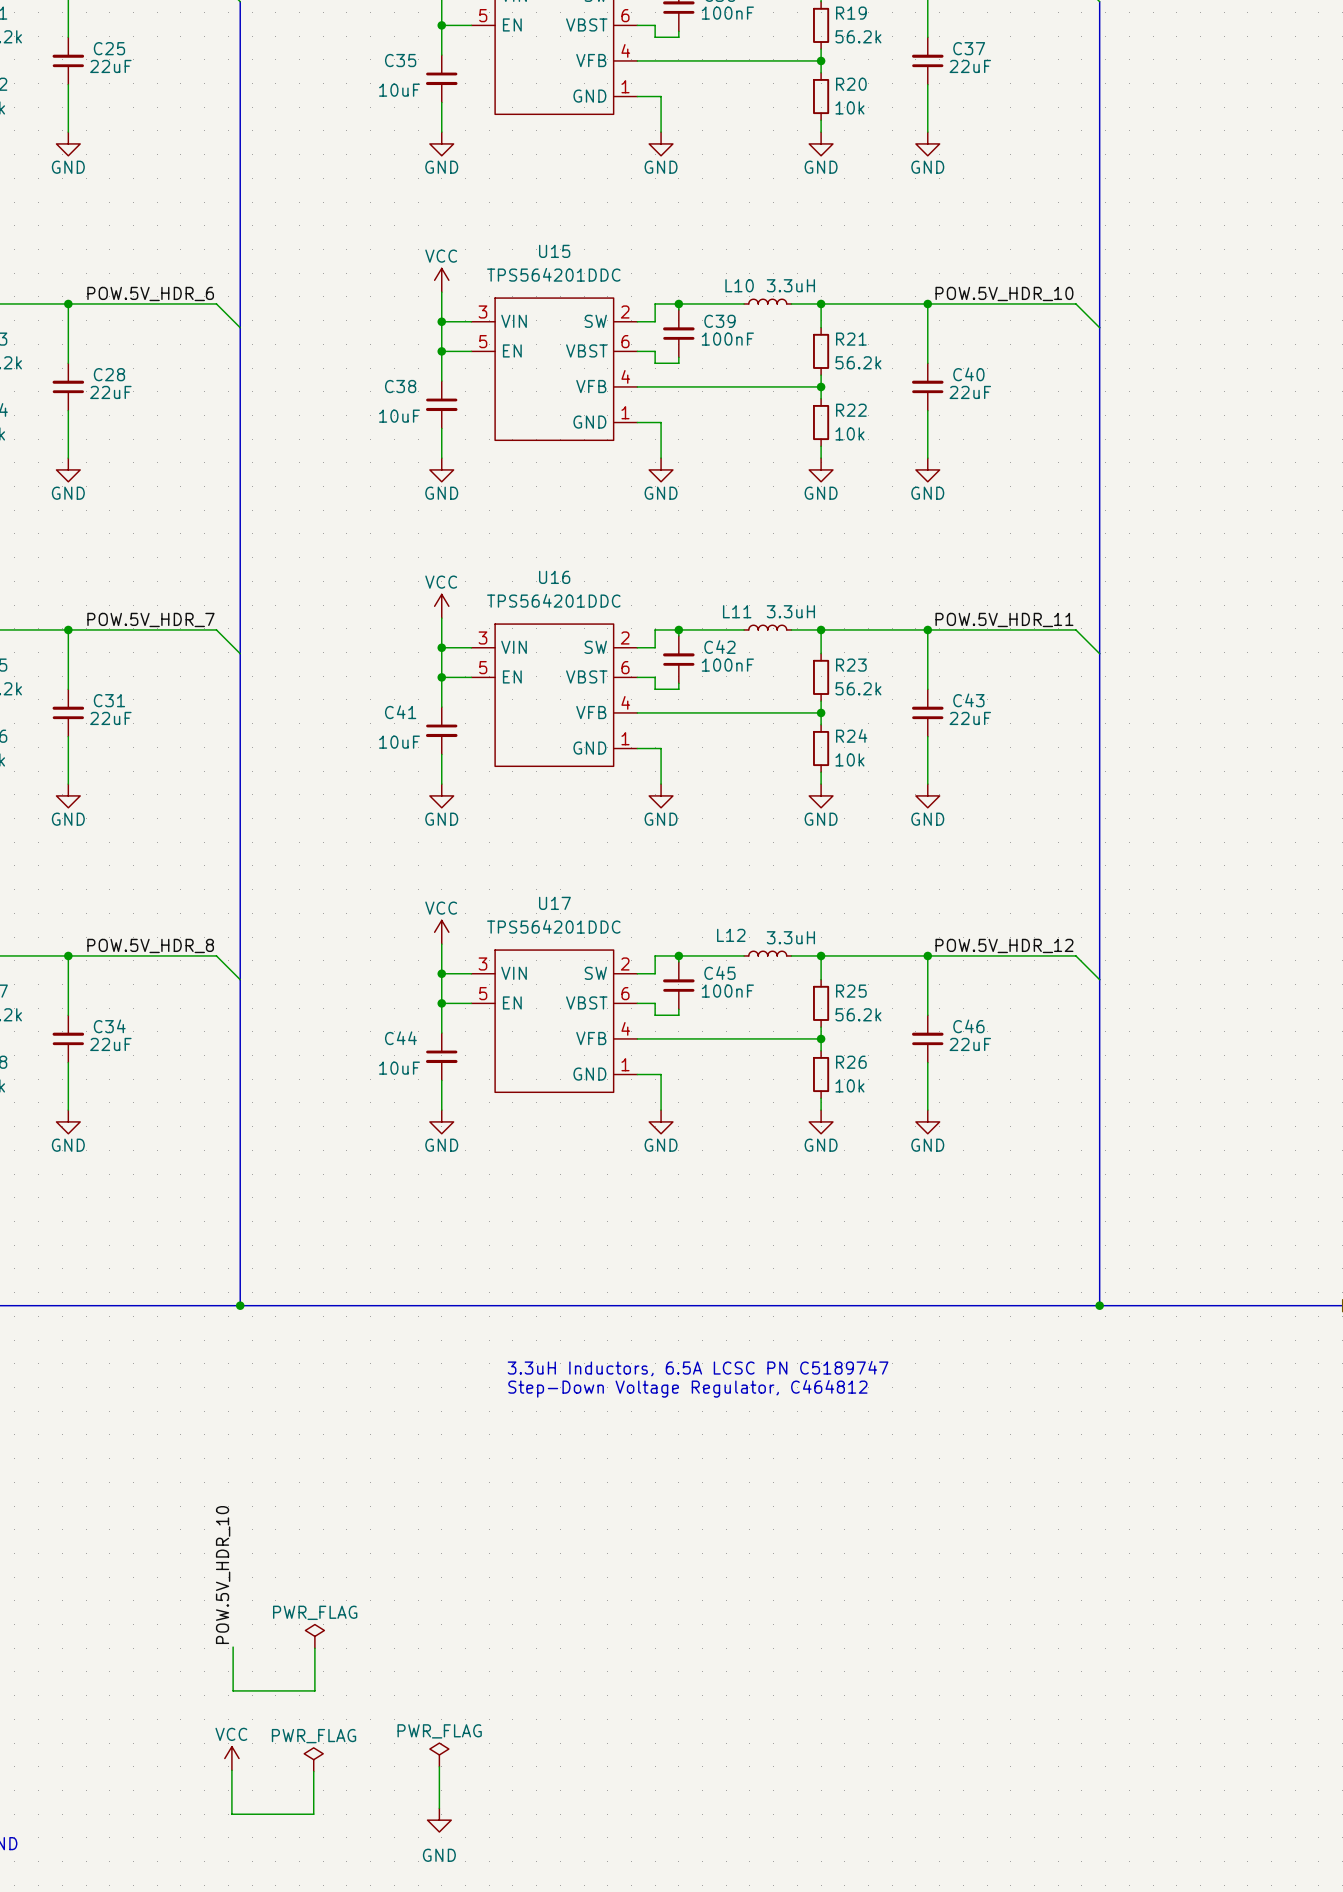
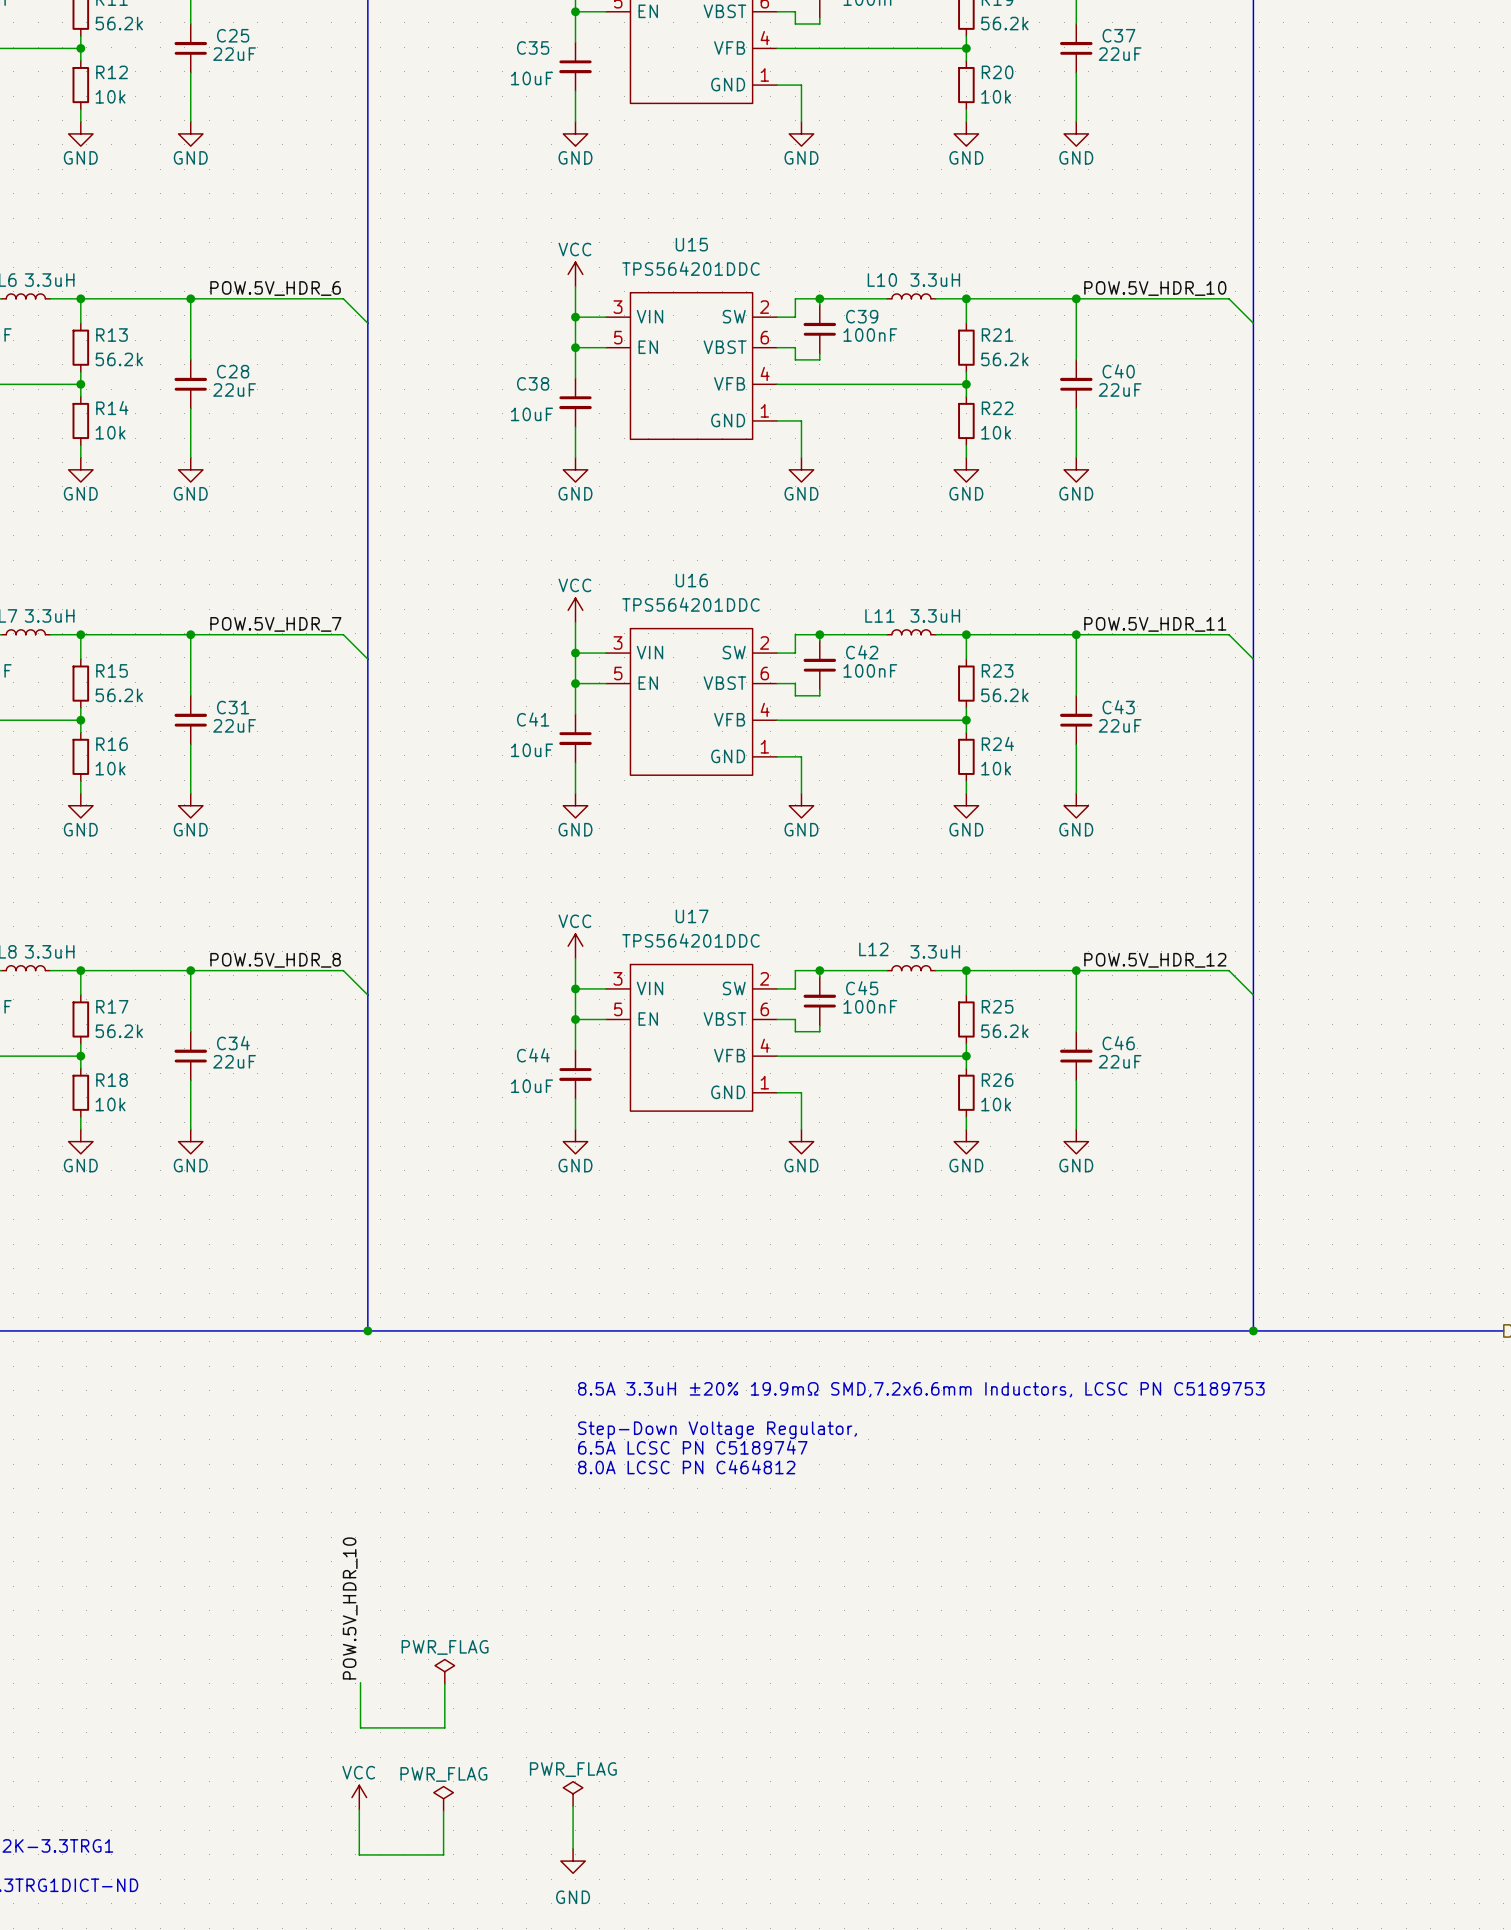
text: 3.3uH Inductors, 6.5A LCSC PN C5189747 (698, 1368) -> 8.5A 3.3uH ±20% 19.9mΩ SMD,7.2x6.6mm Inductors, LCSC PN C5189753 (921, 1389)
text: Step-Down Voltage Regulator, C464812 (687, 1388) -> Step-Down Voltage Regulator, (717, 1430)
text: none -> 6.5A LCSC PN C5189747 (692, 1447)
text: none -> 8.0A LCSC PN C464812 (686, 1467)

